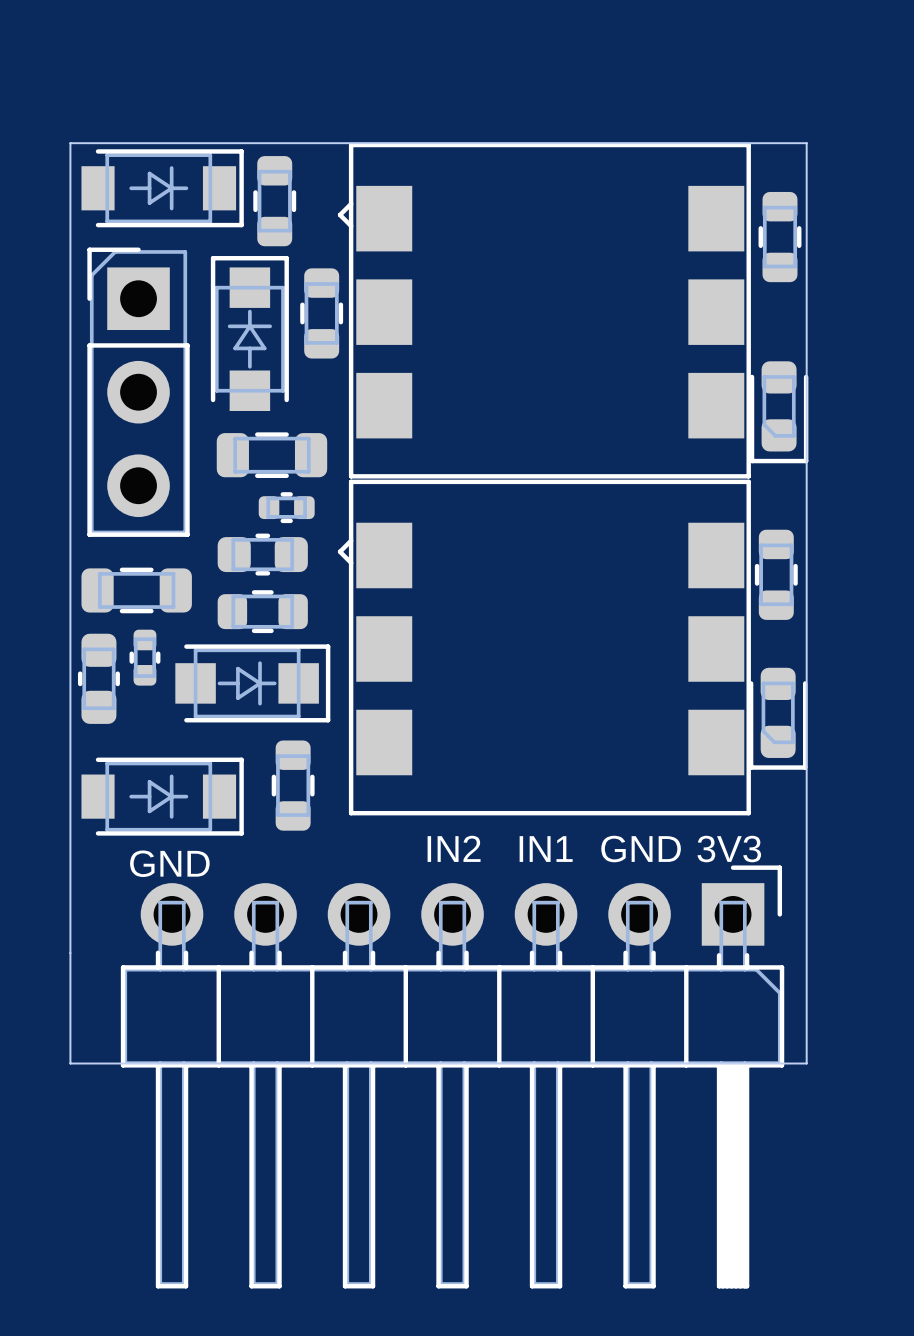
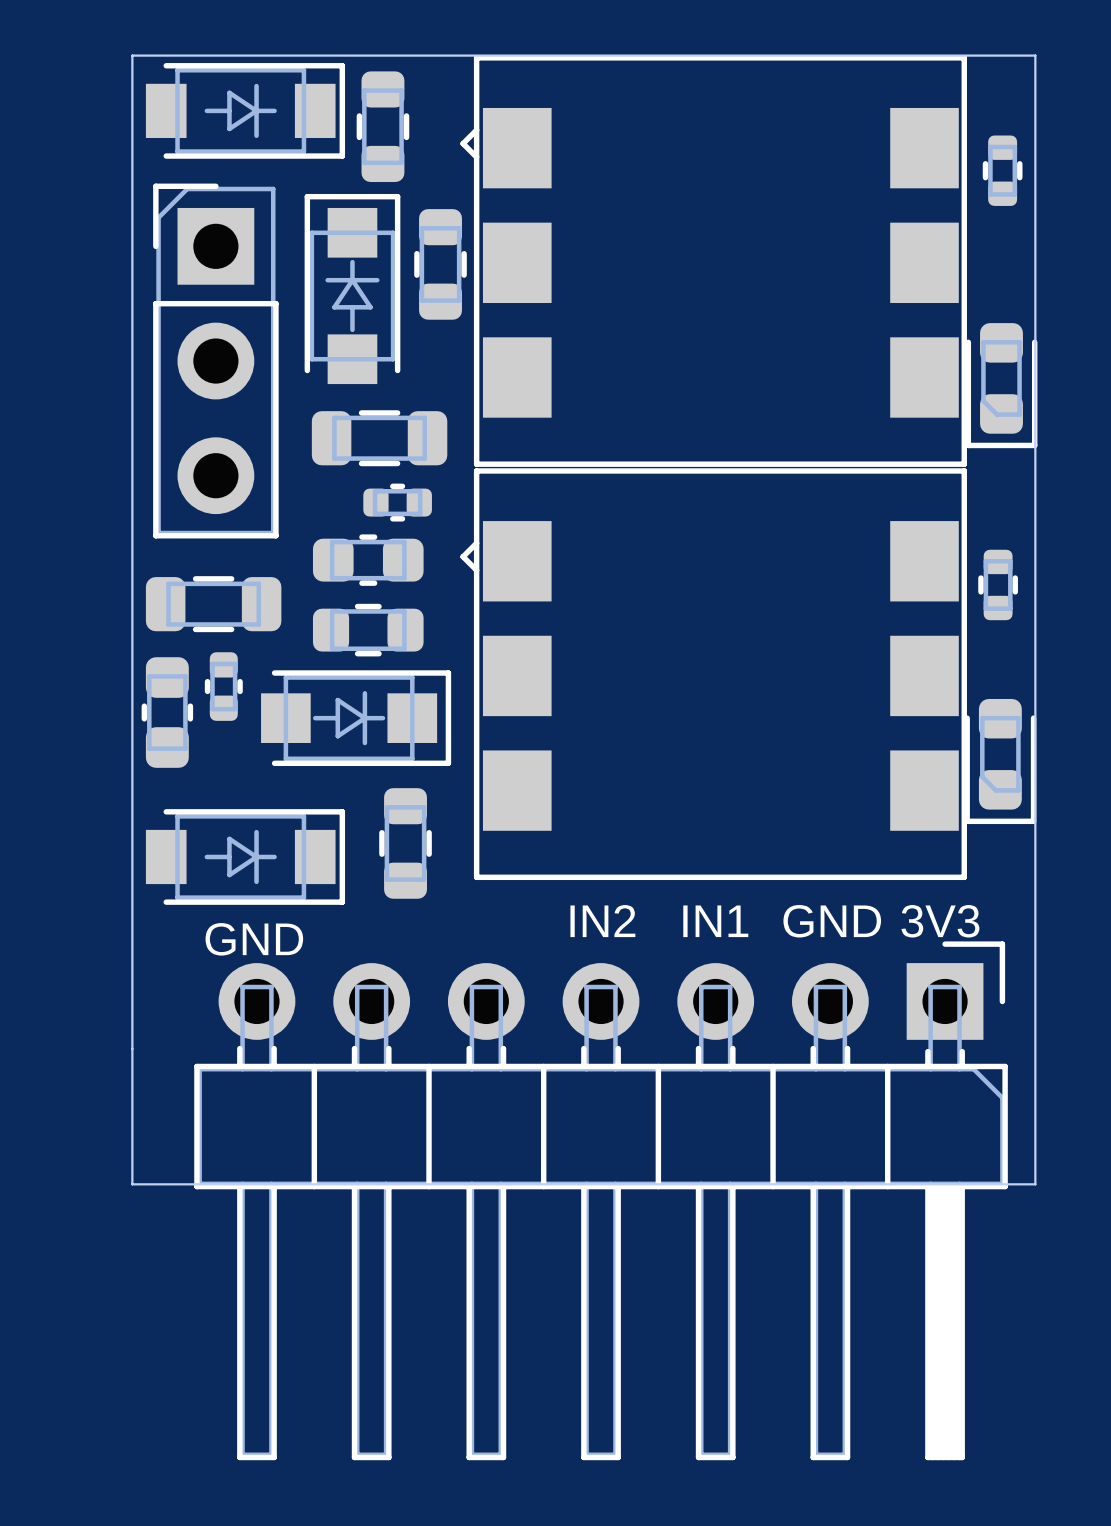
part footprint: [758, 191, 802, 283] -> [982, 135, 1023, 206]
part footprint: [754, 529, 798, 620] -> [978, 549, 1018, 621]

